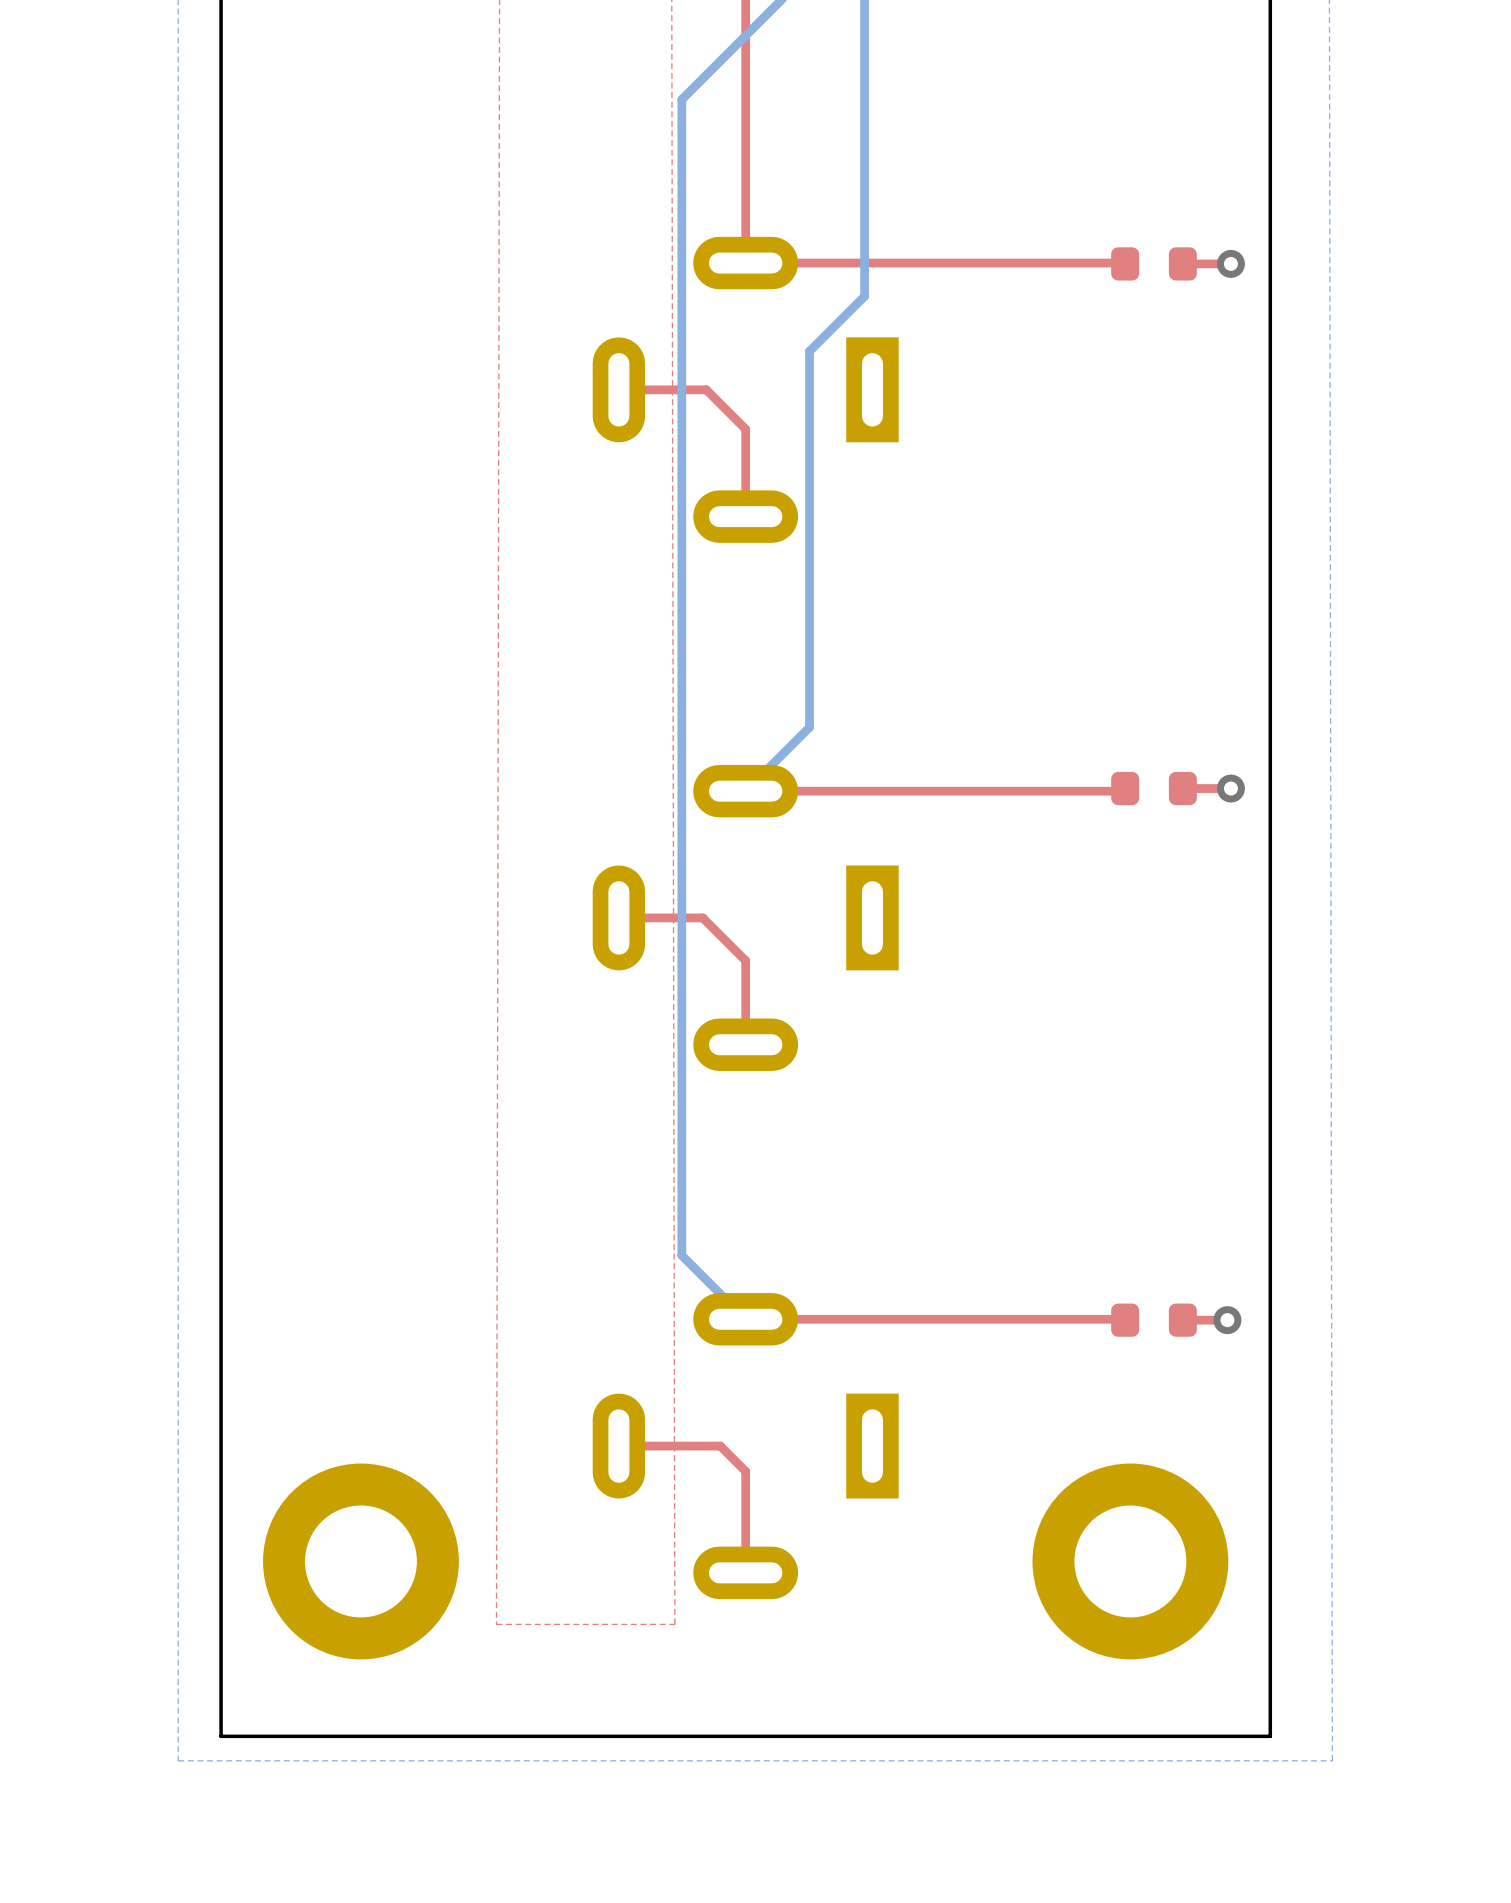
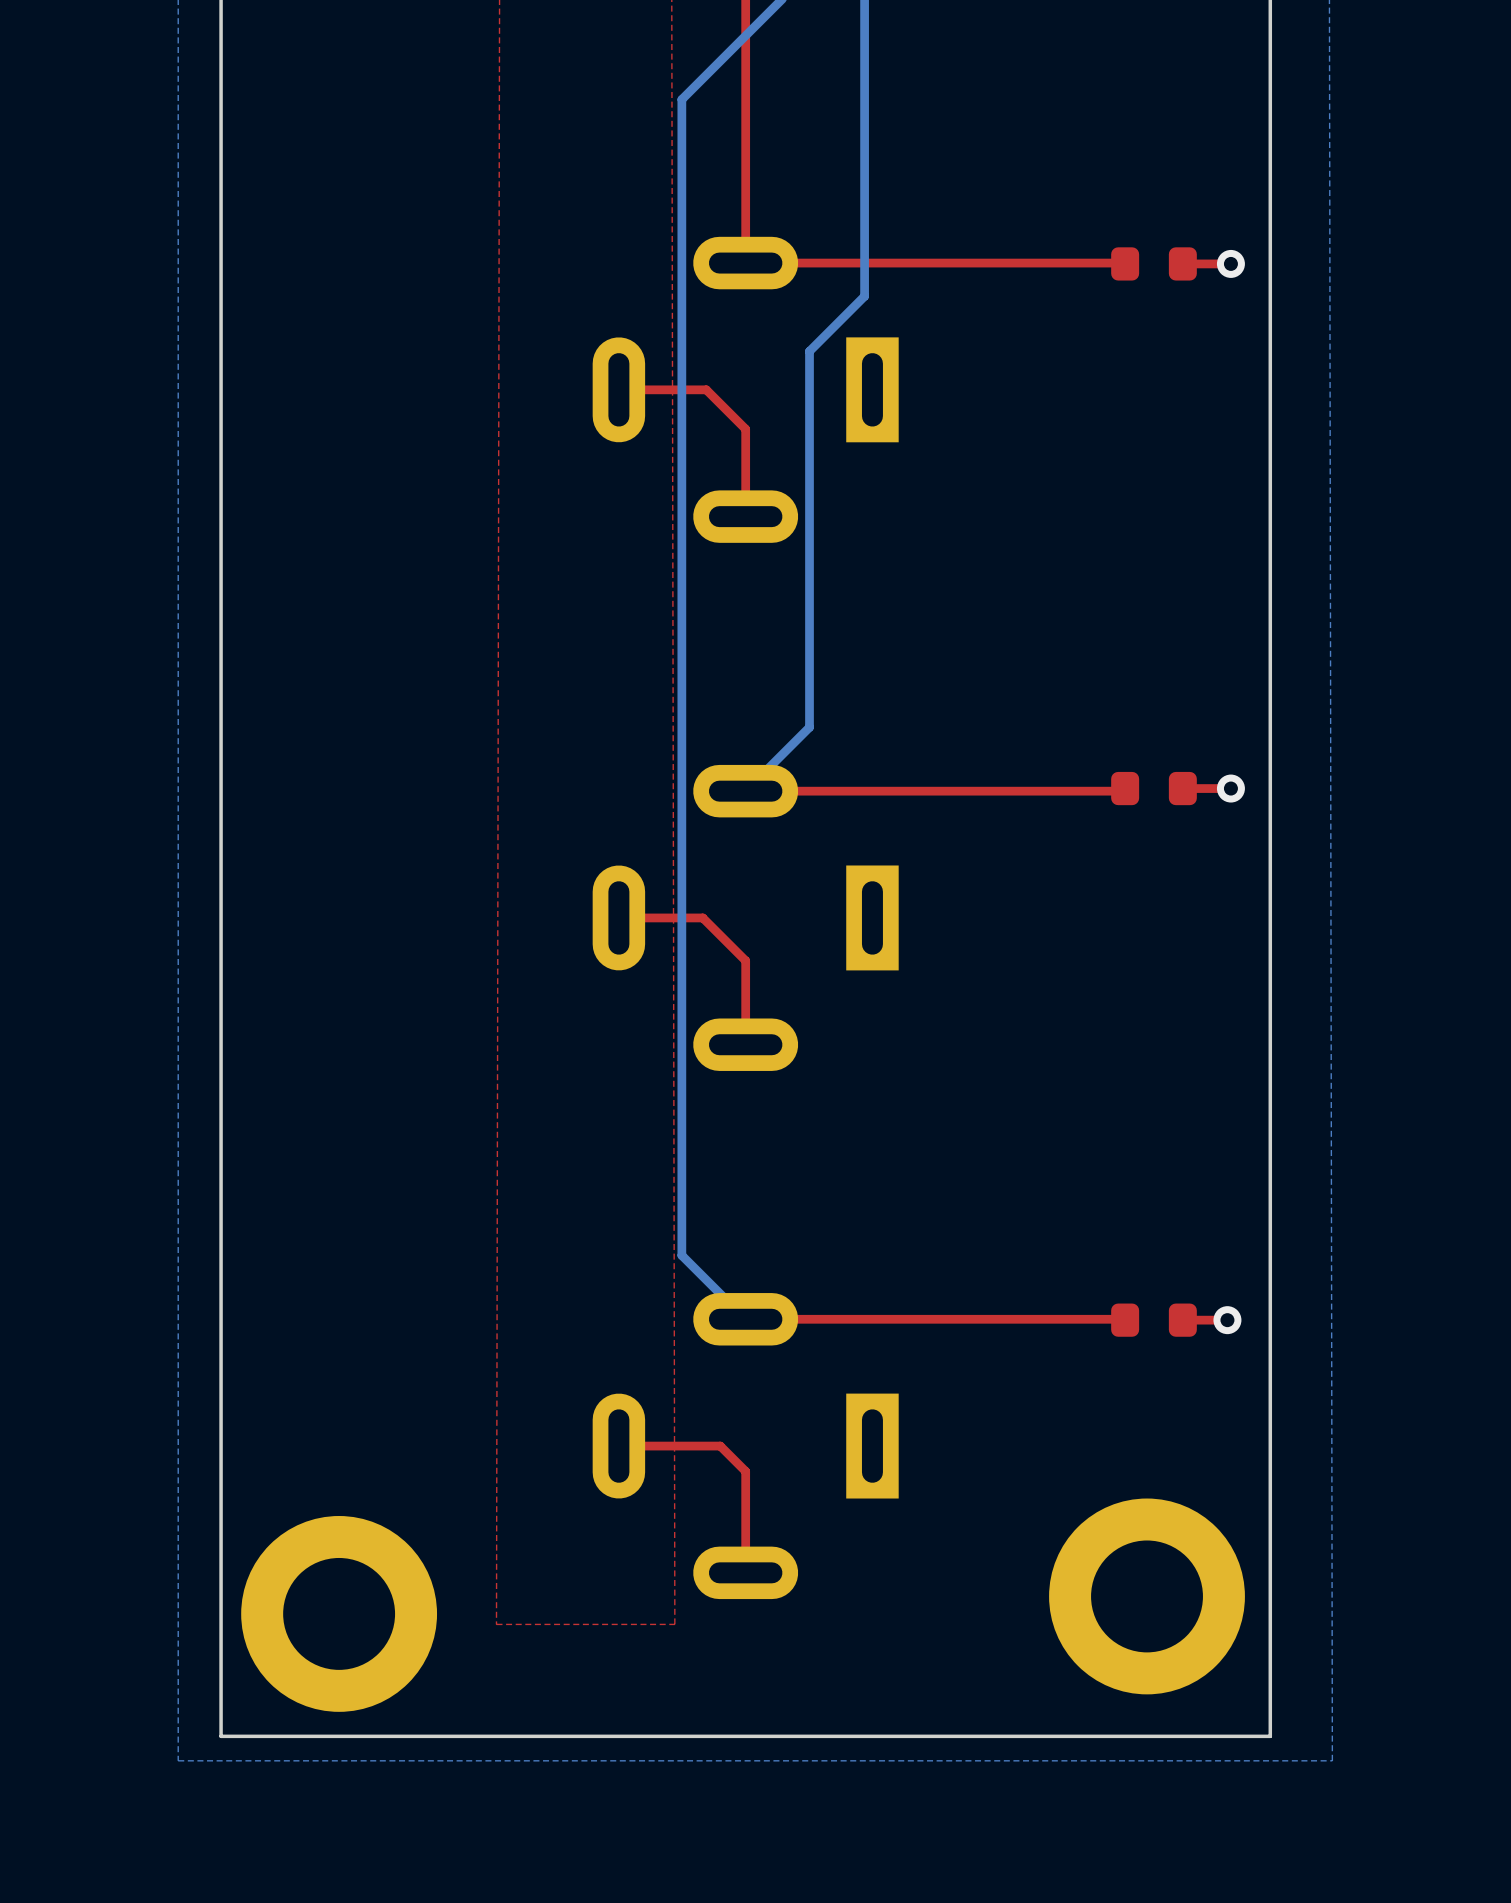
part position: (360, 1561) -> (339, 1613)
part position: (1130, 1561) -> (1147, 1596)

